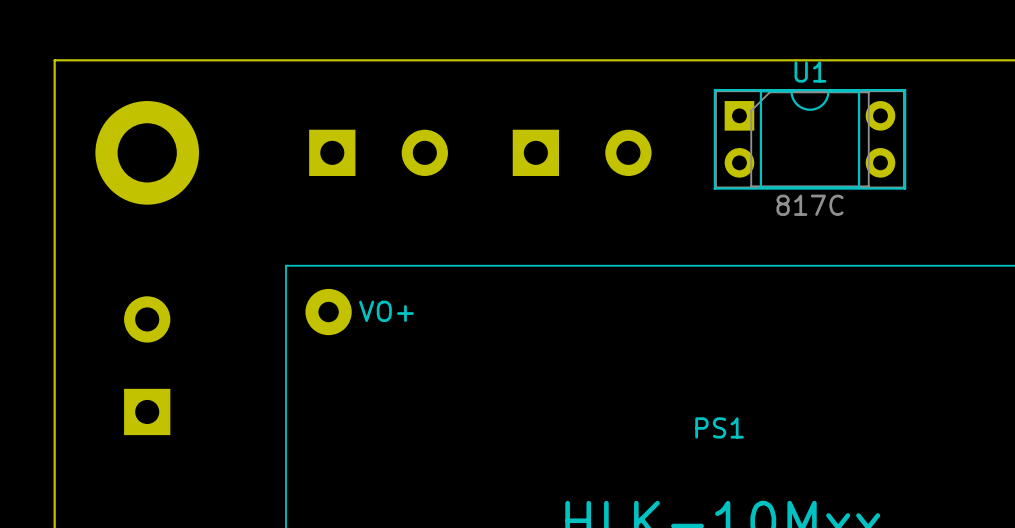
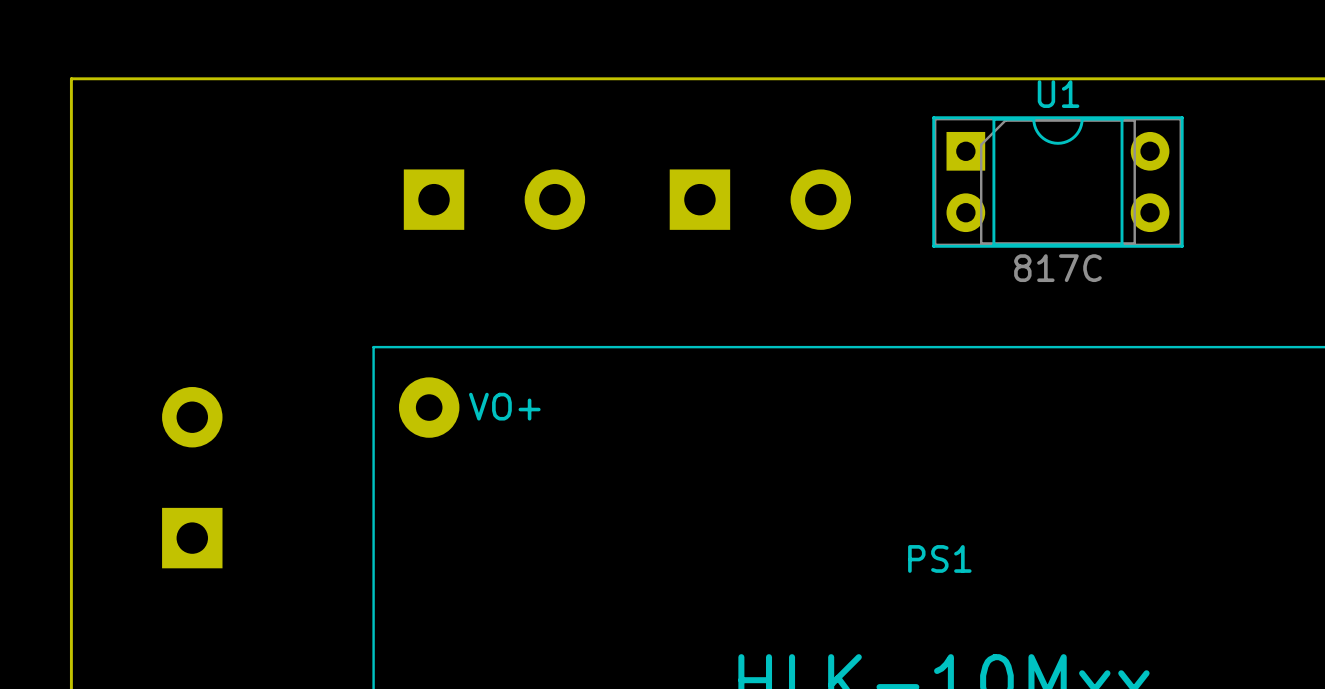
part: (147, 152) -> none

